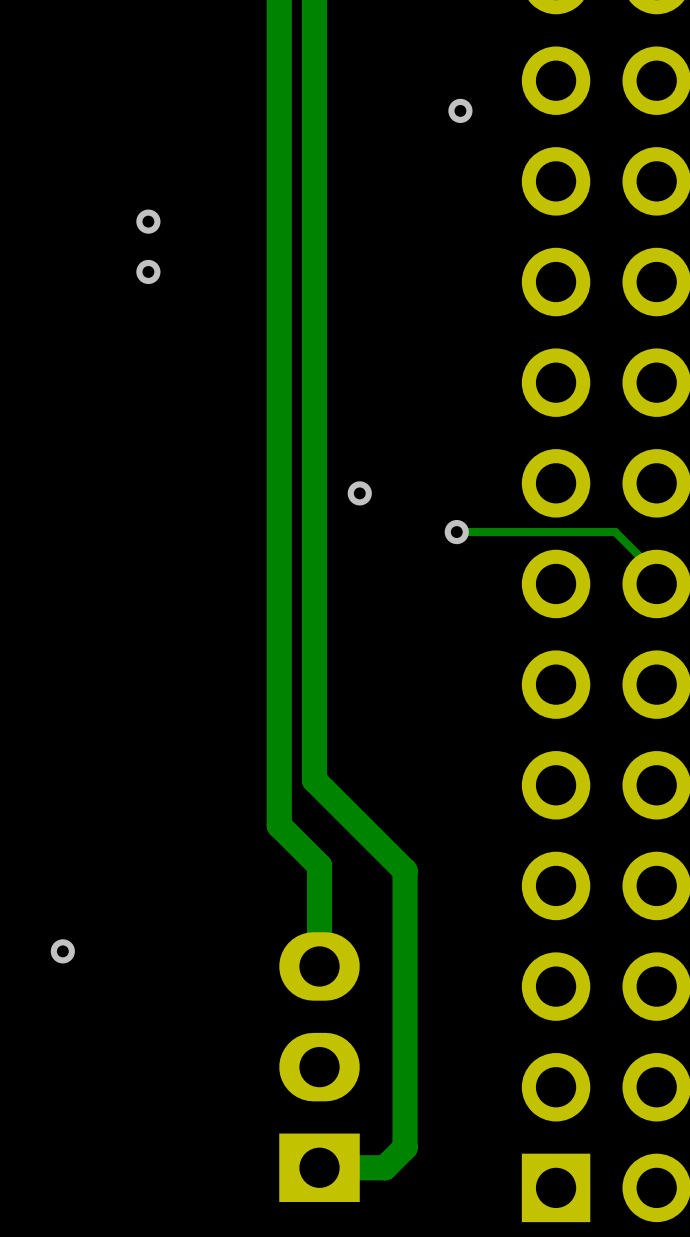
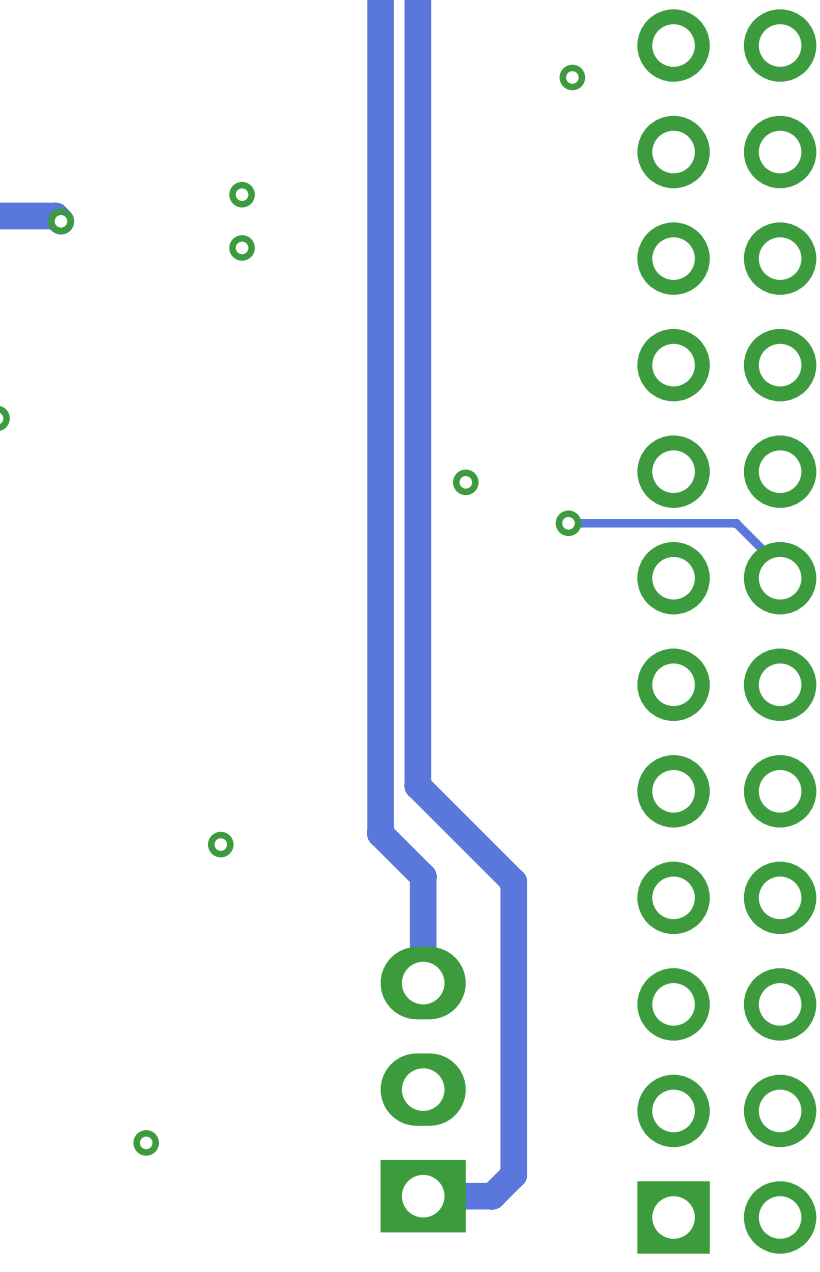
via: none -> (220, 844)
via: (62, 951) -> none
via: none -> (146, 1142)

